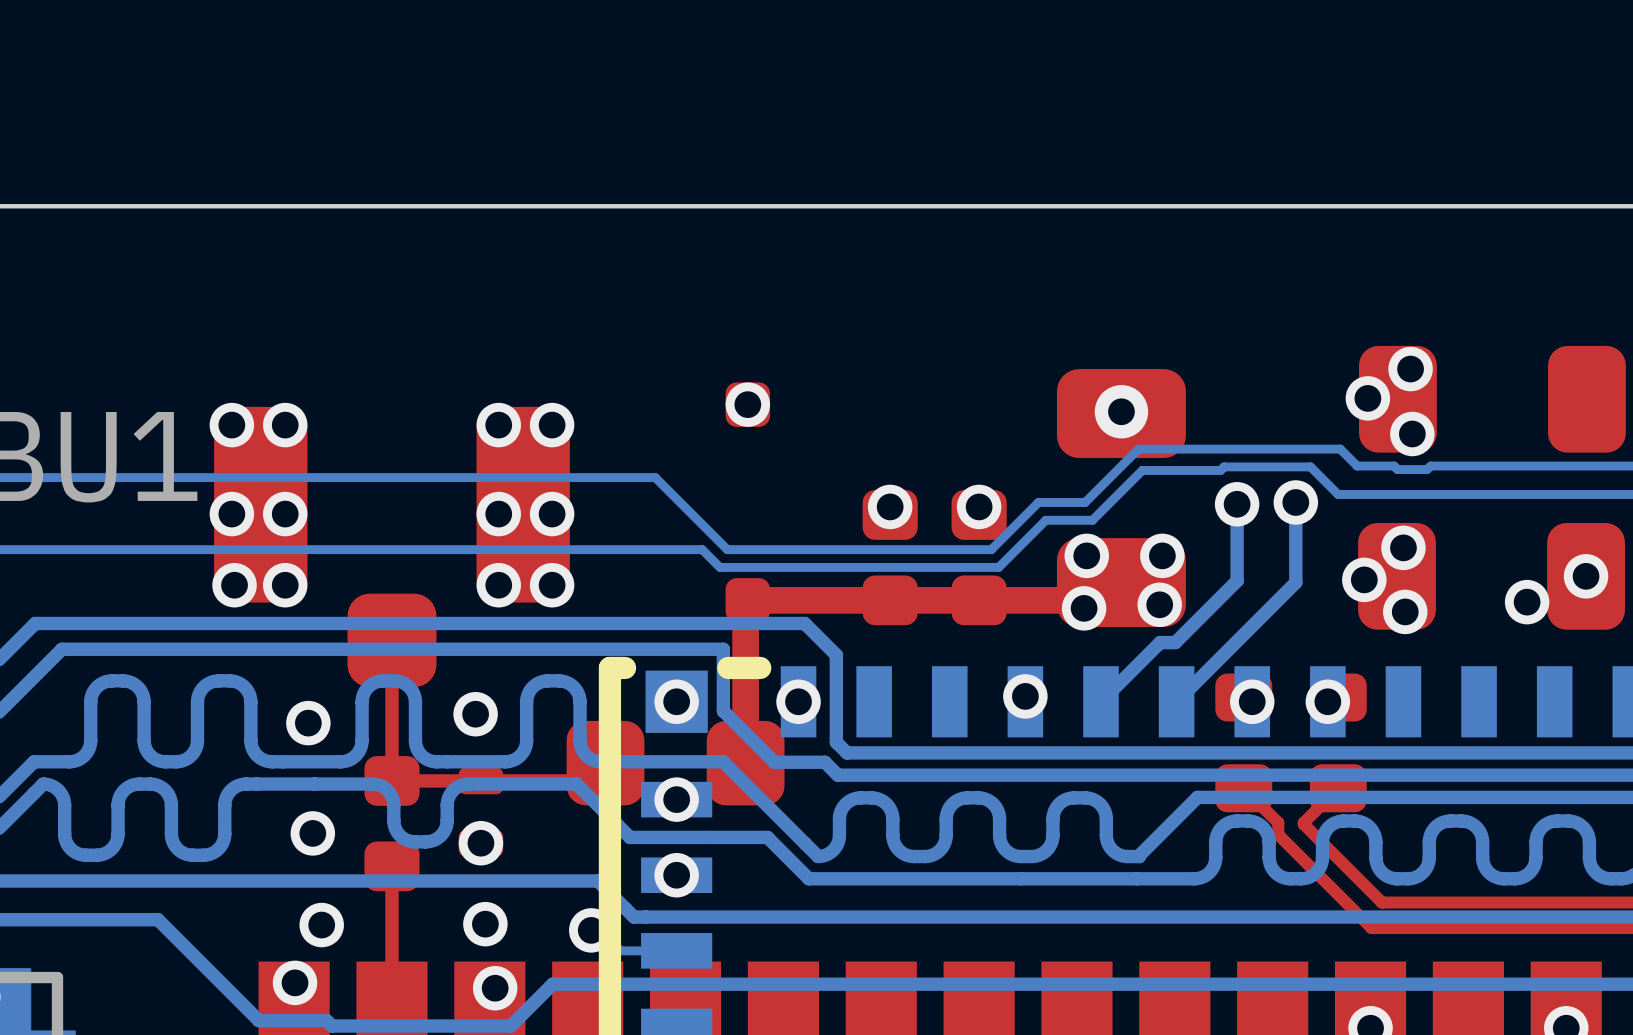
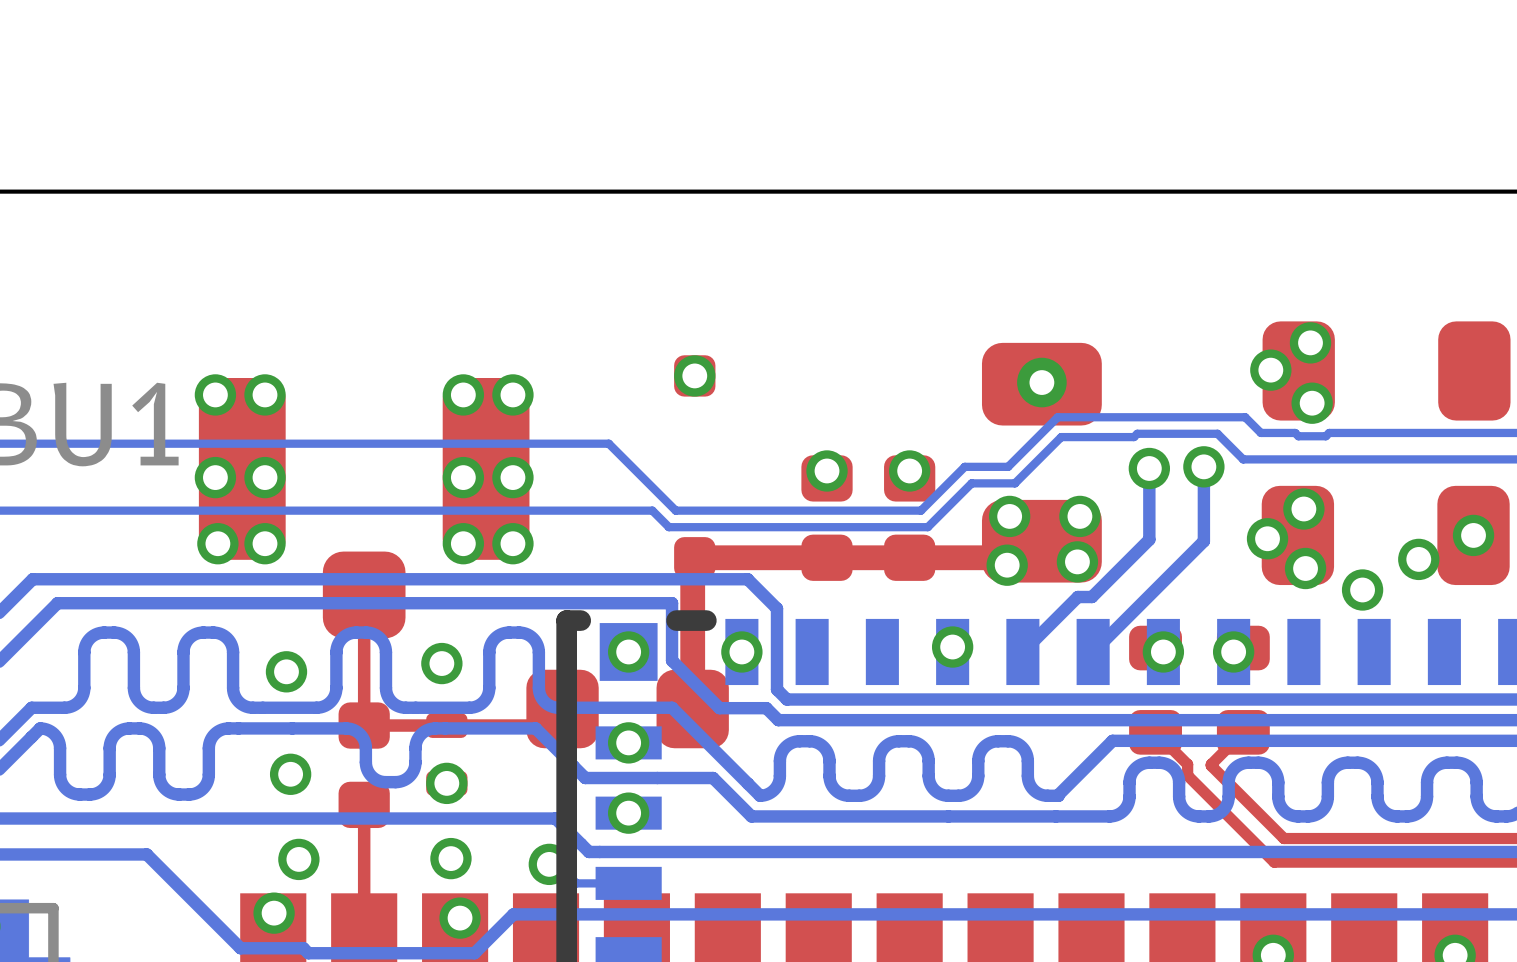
via: none -> (1362, 589)

